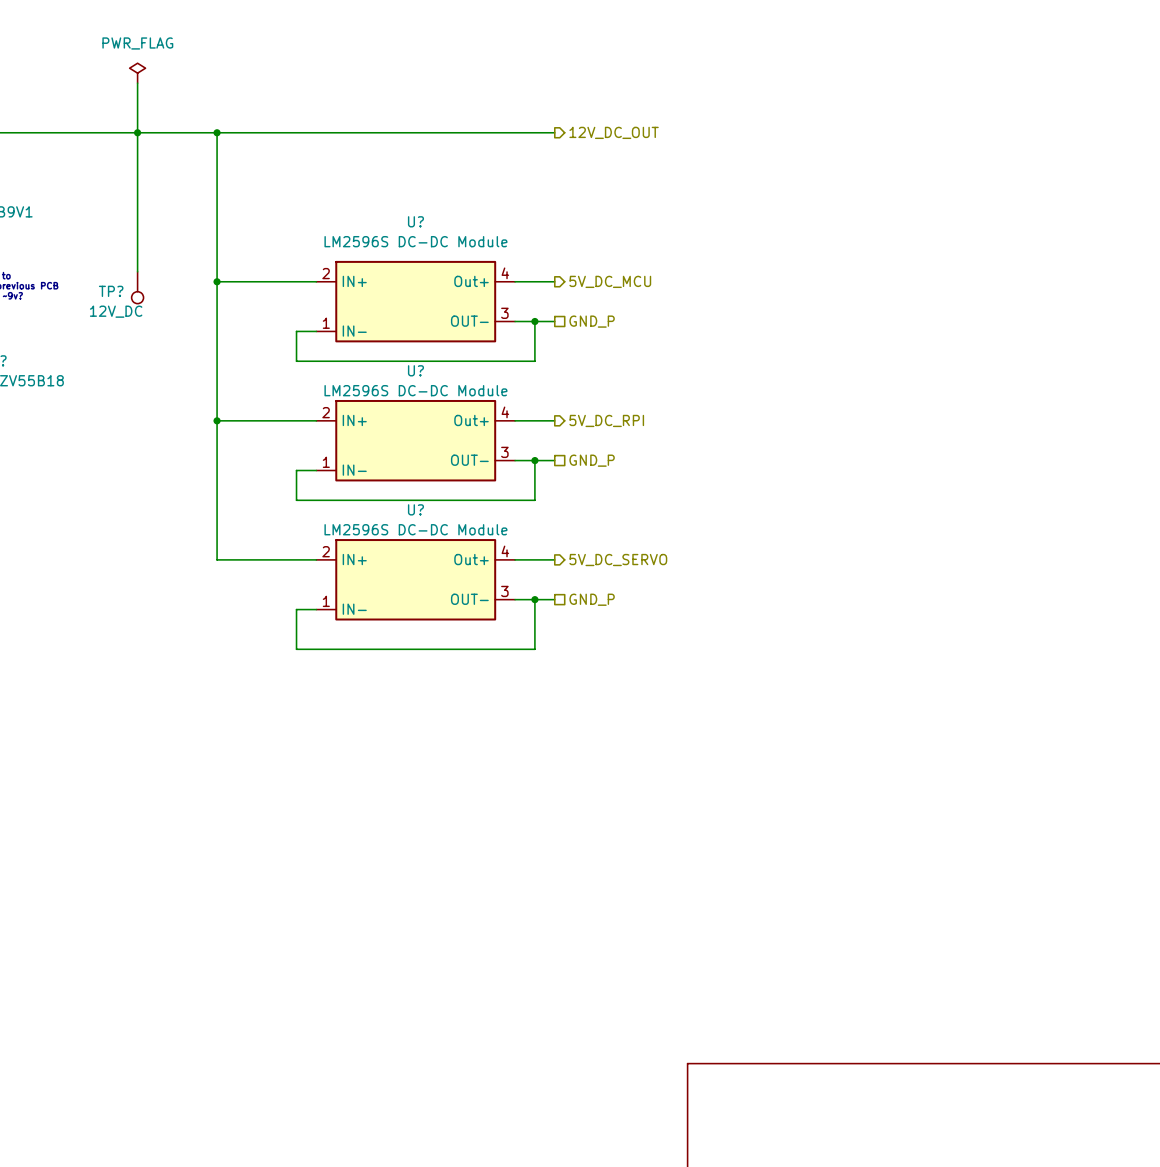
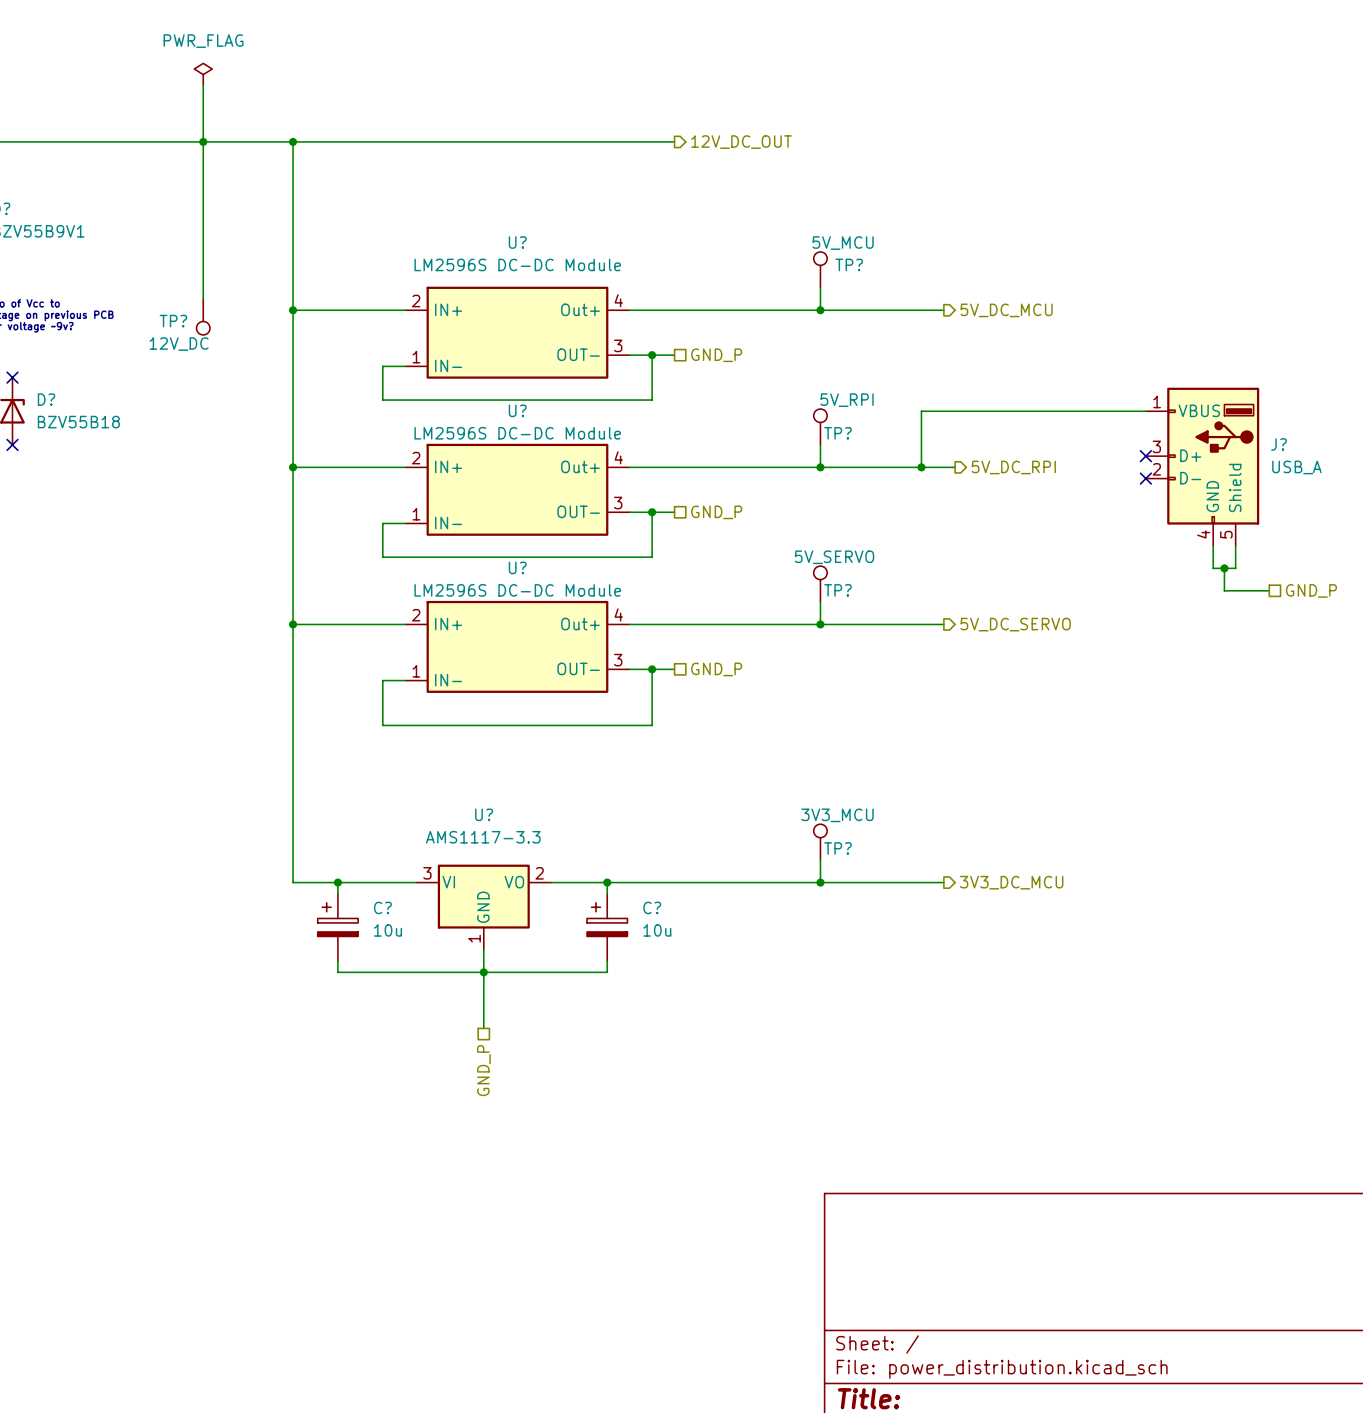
TP?: none -> 5V_MCU (820, 269)
wire: none -> (820, 287) (820, 310)
wire: none -> (674, 310) (943, 310)
hierarchical label: 5V_DC_MCU (610, 281) -> none
junction: none -> (820, 310)
hierarchical label: none -> 5V_DC_MCU (1006, 310)
wire: none -> (1145, 411) (921, 411) (921, 467)
TP?: none -> 5V_RPI (820, 426)
wire: none -> (820, 444) (820, 467)
no-connect mark: none -> (1145, 456)
wire: none -> (674, 467) (955, 467)
hierarchical label: 5V_DC_RPI (606, 420) -> none
junction: none -> (820, 467)
junction: none -> (921, 467)
hierarchical label: none -> 5V_DC_RPI (1013, 467)
J?: none -> USB_A (1202, 466)
no-connect mark: none -> (1145, 478)
wire: none -> (1213, 545) (1213, 568) (1235, 568) (1235, 545)
wire: none -> (1224, 568) (1224, 590) (1269, 590)
junction: none -> (1224, 568)
TP?: none -> 5V_SERVO (820, 584)
hierarchical label: none -> GND_P (1311, 590)
wire: none -> (820, 602) (820, 624)
wire: none -> (293, 624) (293, 882) (416, 882)
junction: none -> (293, 624)
wire: none -> (674, 624) (943, 624)
junction: none -> (820, 624)
hierarchical label: 5V_DC_SERVO (618, 560) -> none
hierarchical label: none -> 5V_DC_SERVO (1015, 624)
TP?: none -> 3V3_MCU (820, 842)
wire: none -> (820, 860) (820, 882)
wire: none -> (337, 882) (337, 893)
junction: none -> (337, 882)
wire: none -> (551, 882) (943, 882)
wire: none -> (607, 882) (607, 893)
junction: none -> (607, 882)
junction: none -> (820, 882)
hierarchical label: none -> 3V3_DC_MCU (1011, 882)
U?: none -> AMS1117-3.3 (483, 907)
C?: none -> 10u (337, 927)
C?: none -> 10u (607, 927)
wire: none -> (483, 949) (483, 1028)
wire: none -> (337, 961) (337, 972) (607, 972) (607, 961)
junction: none -> (483, 972)
hierarchical label: none -> GND_P (483, 1070)

